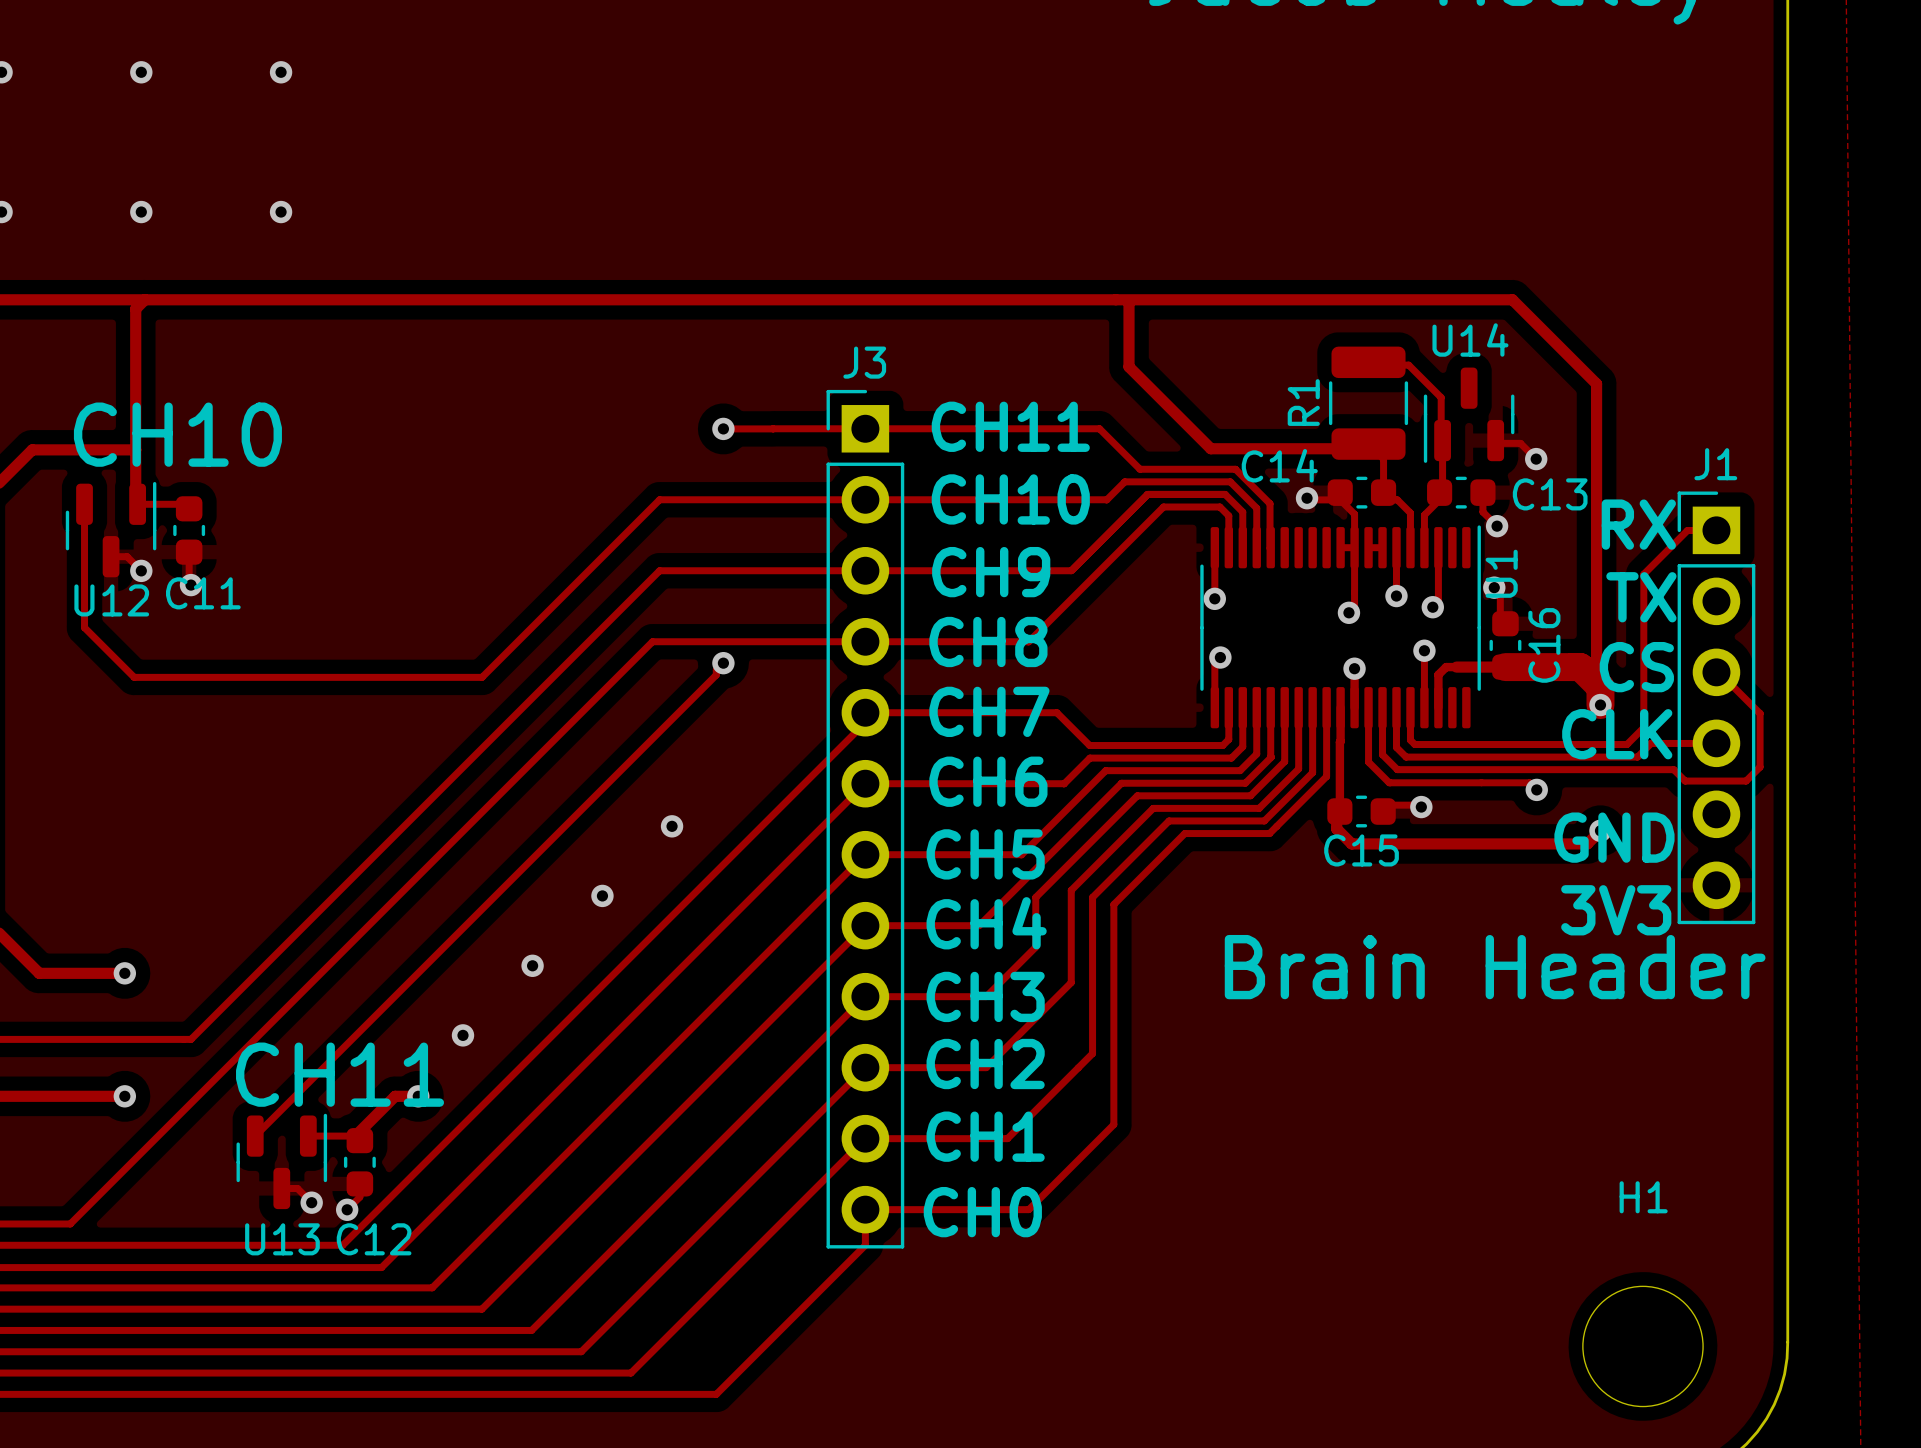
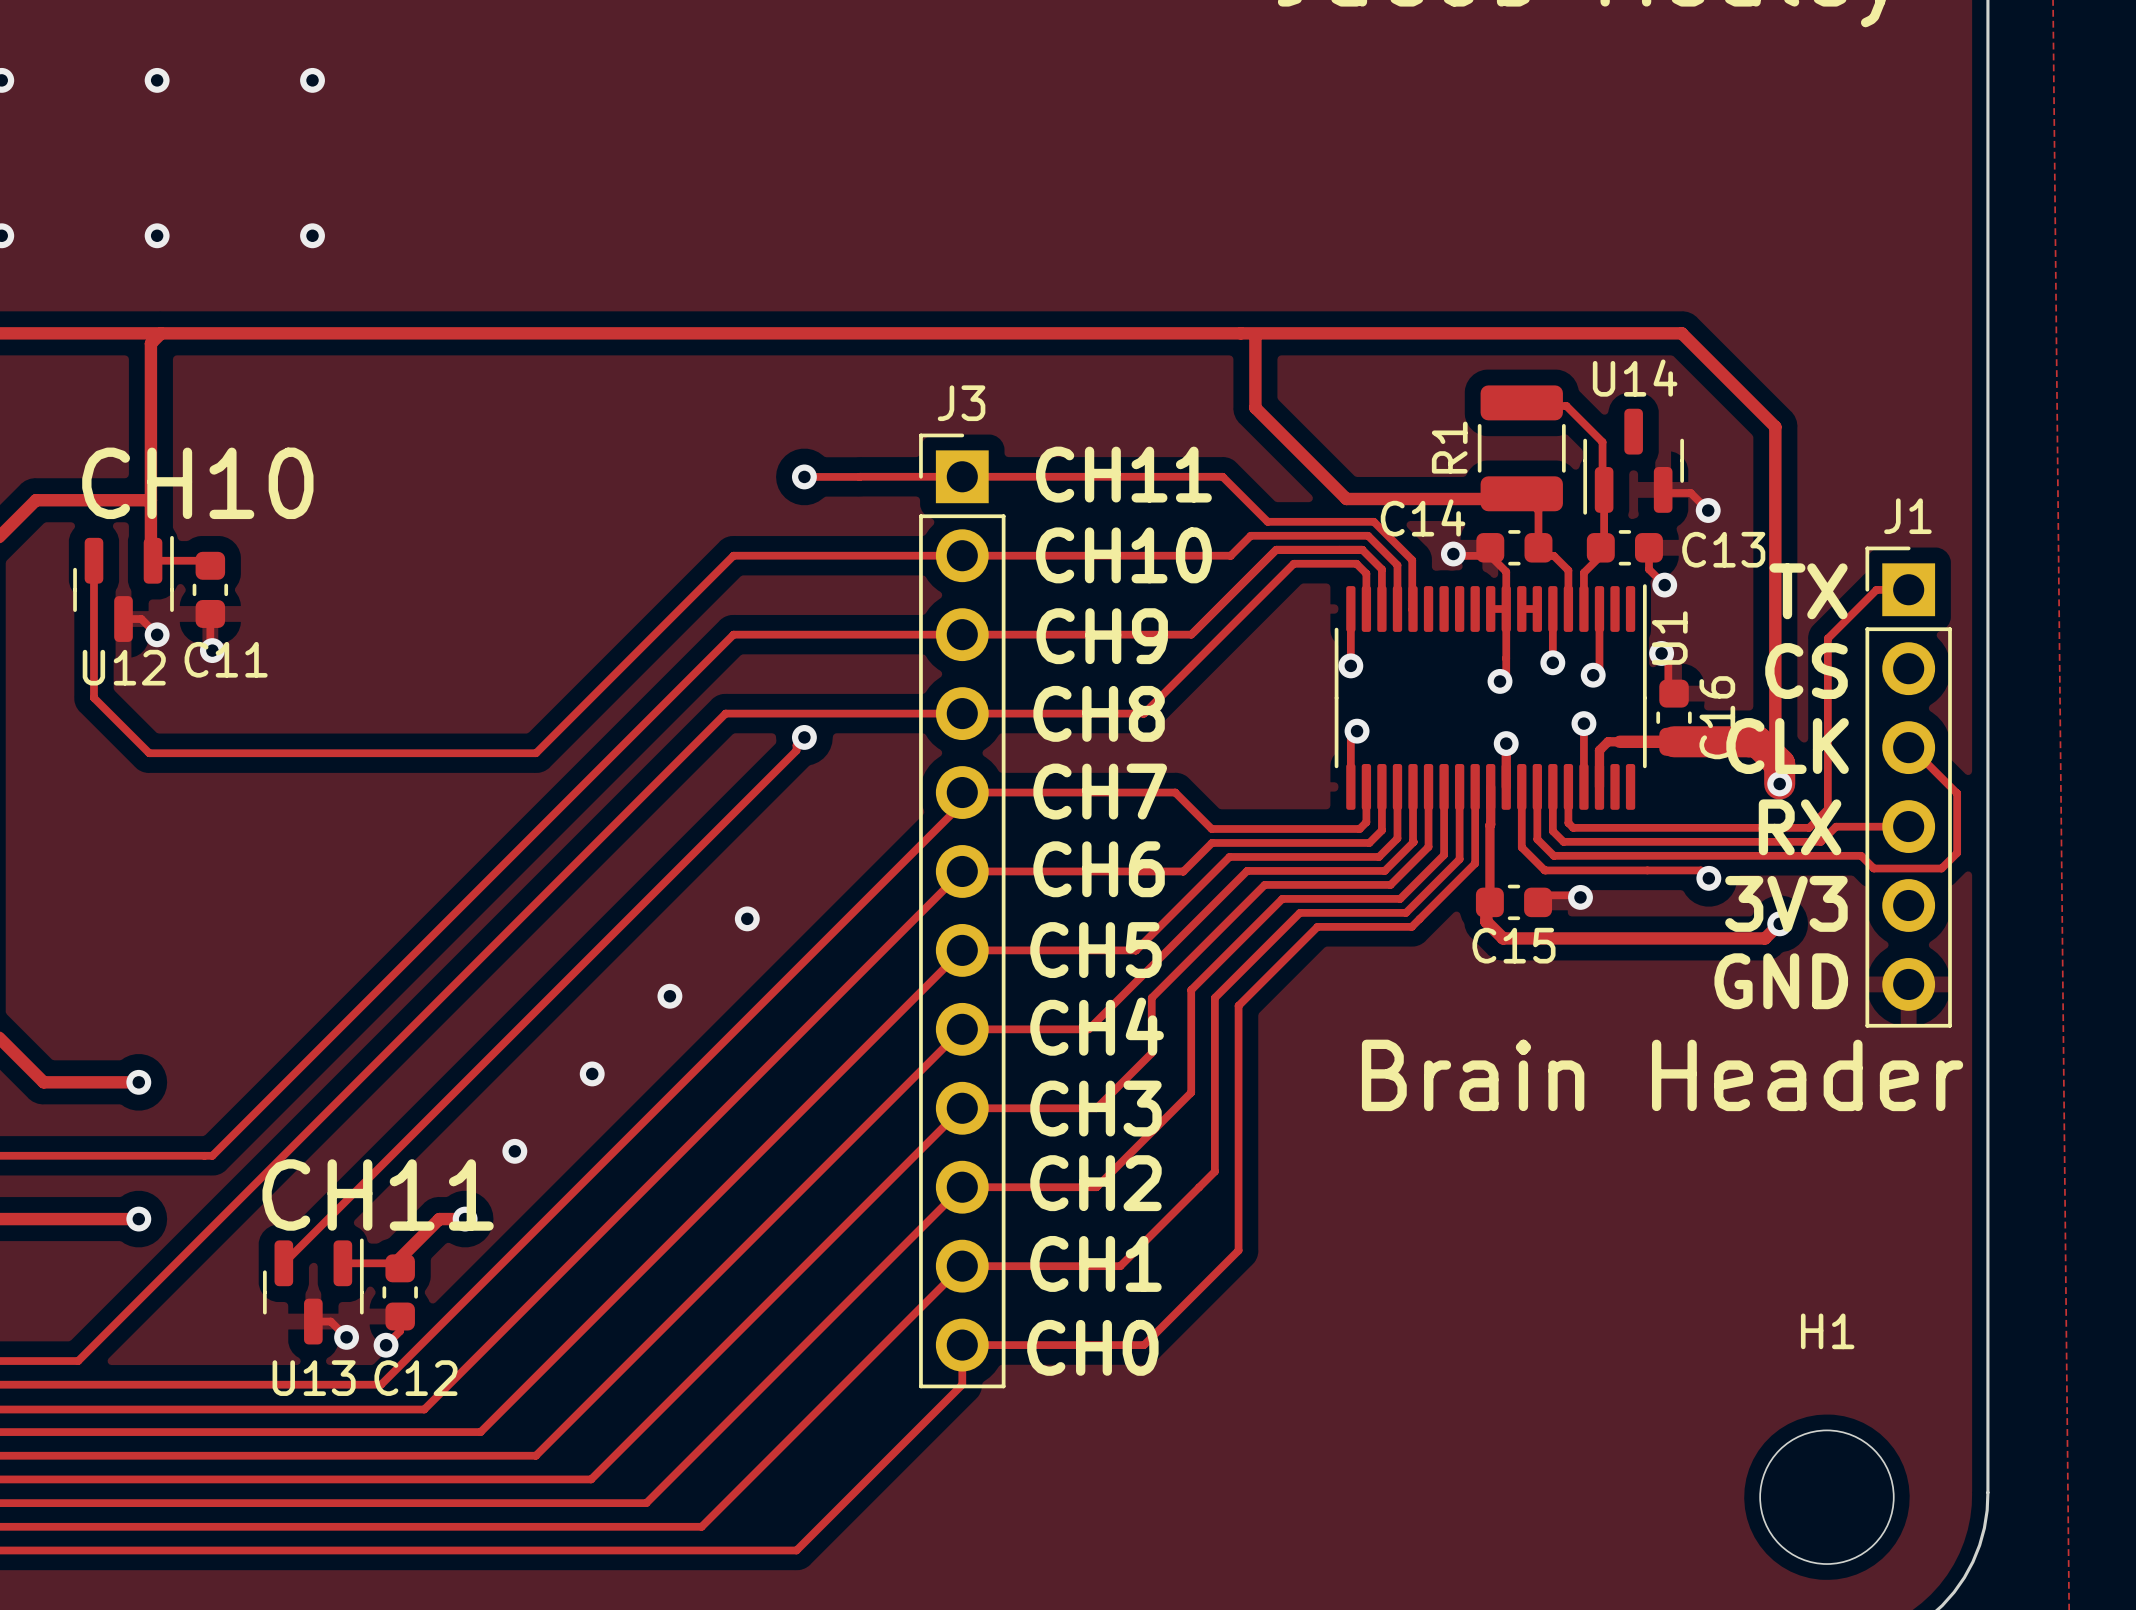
text position: RX (1638, 524) -> RX (1800, 827)
text position: TX (1641, 597) -> TX (1808, 591)
text position: CS (1636, 667) -> CS (1806, 671)
text position: CLK (1617, 734) -> CLK (1787, 746)
text position: GND (1614, 837) -> GND (1781, 981)
text position: 3V3 (1616, 910) -> 3V3 (1786, 903)

